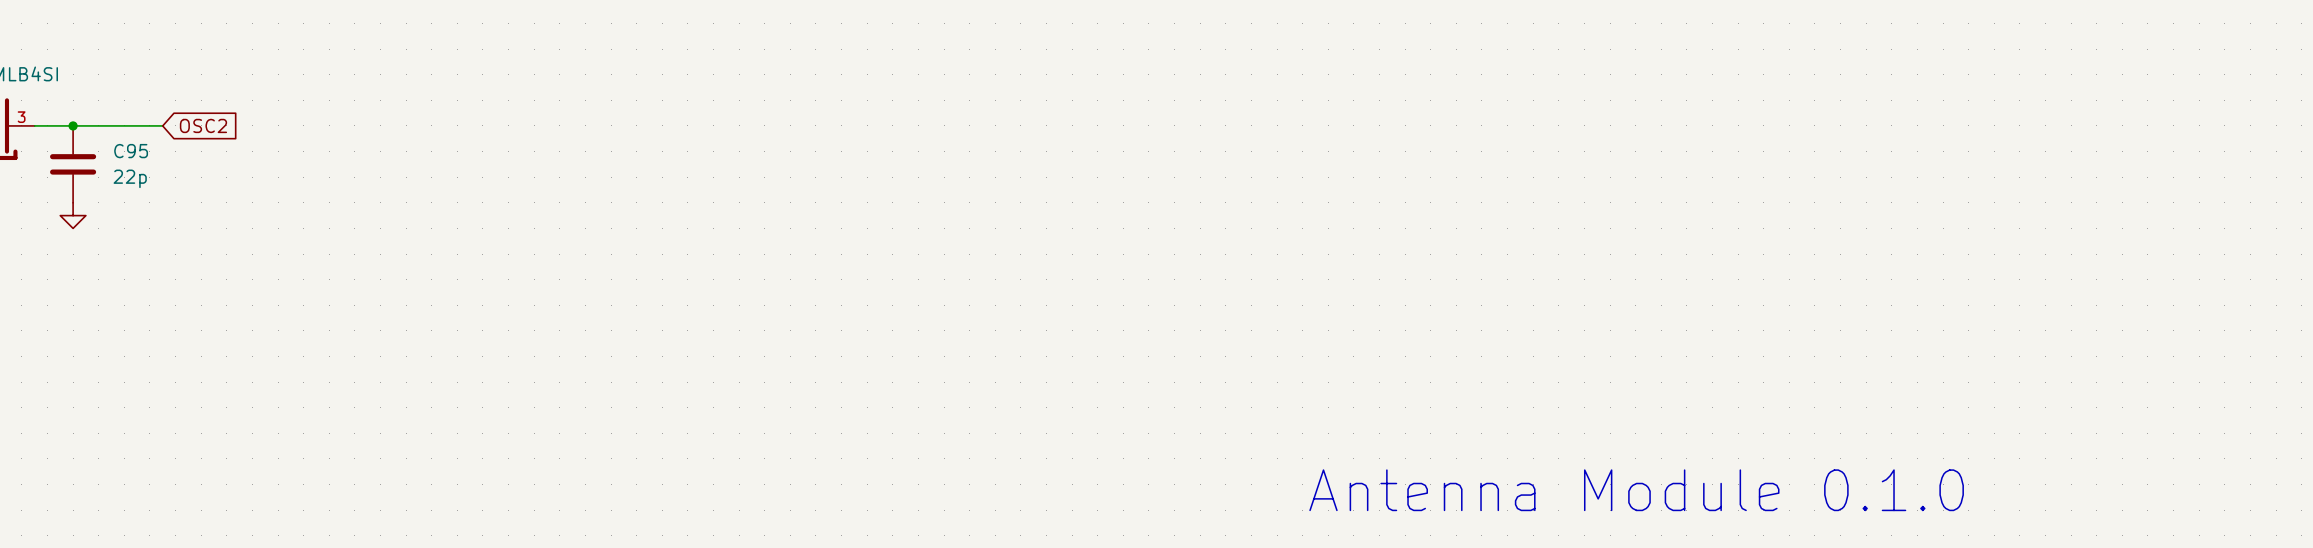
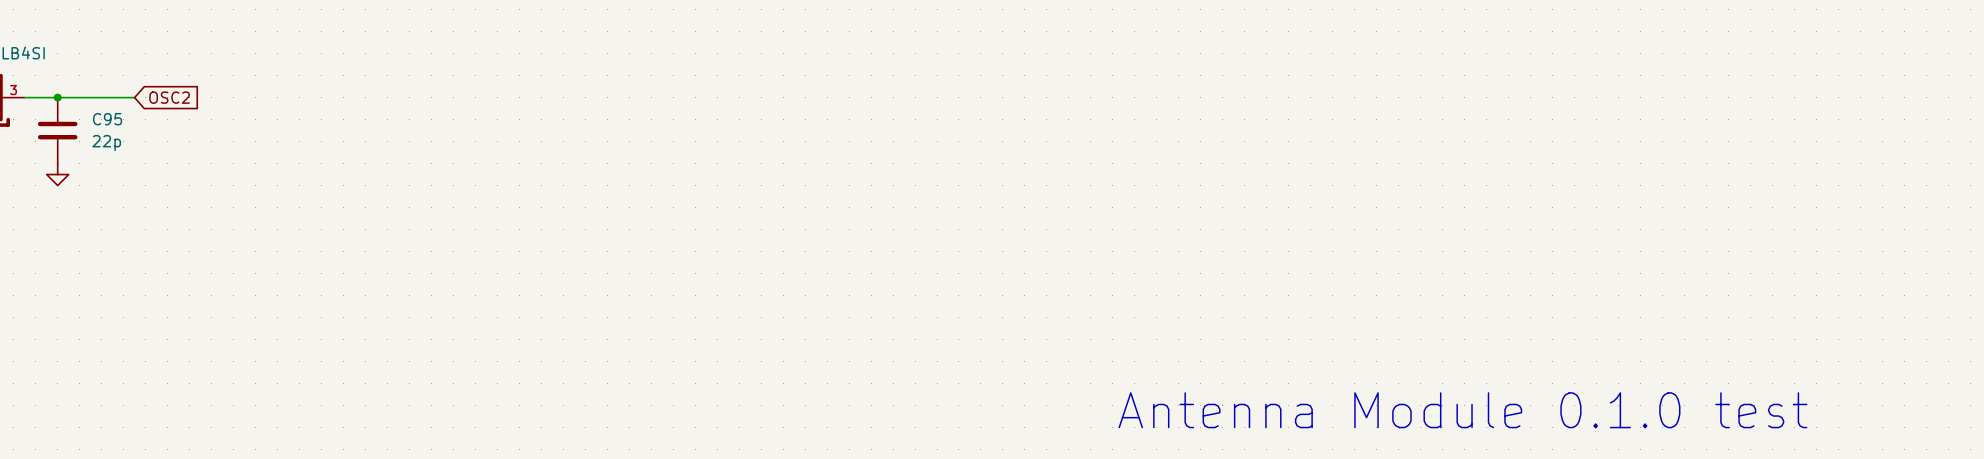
text: Antenna Module 0.1.0 (1636, 490) -> Antenna Module 0.1.0 test (1462, 410)

